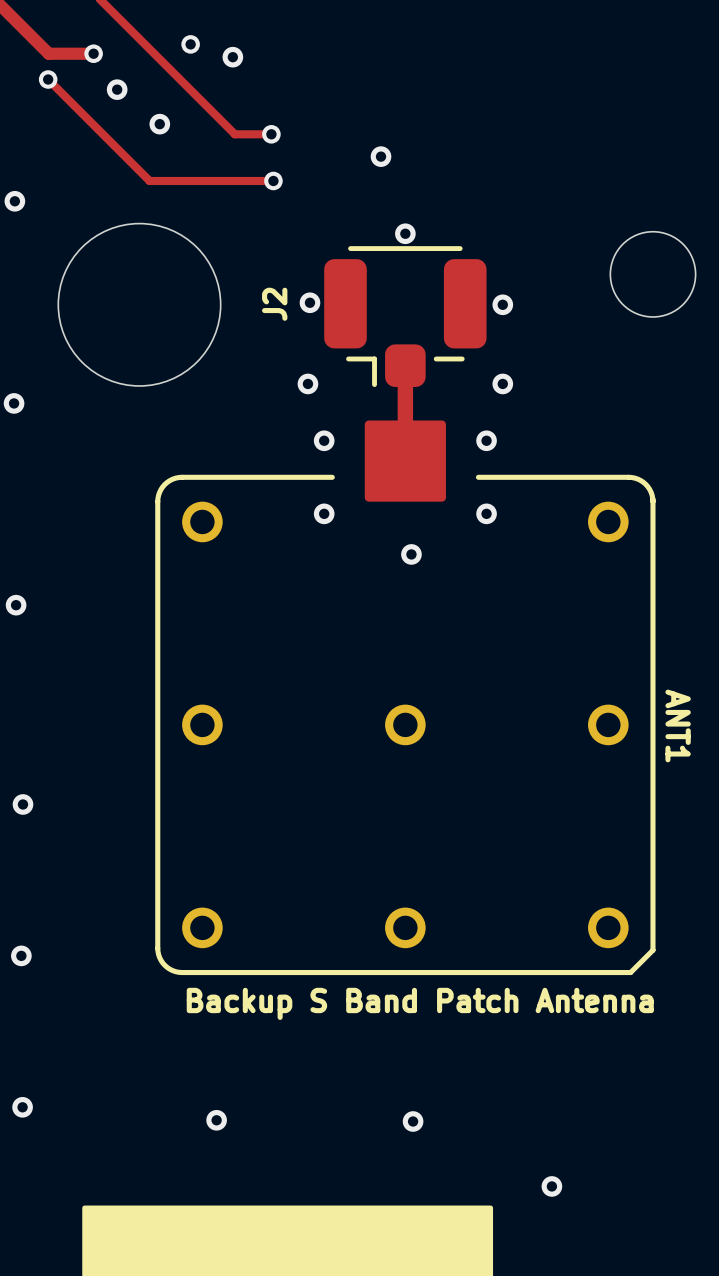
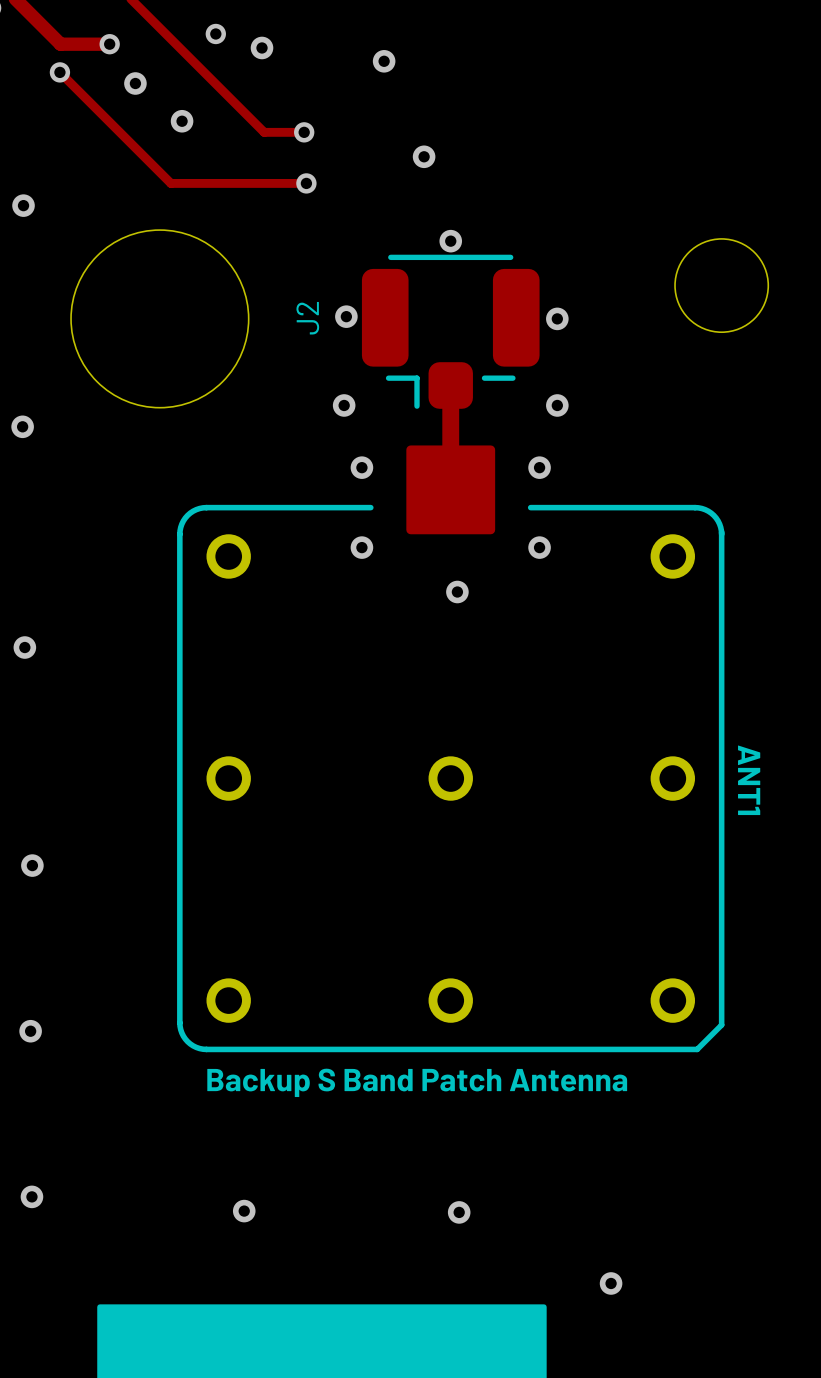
via: none -> (384, 61)

